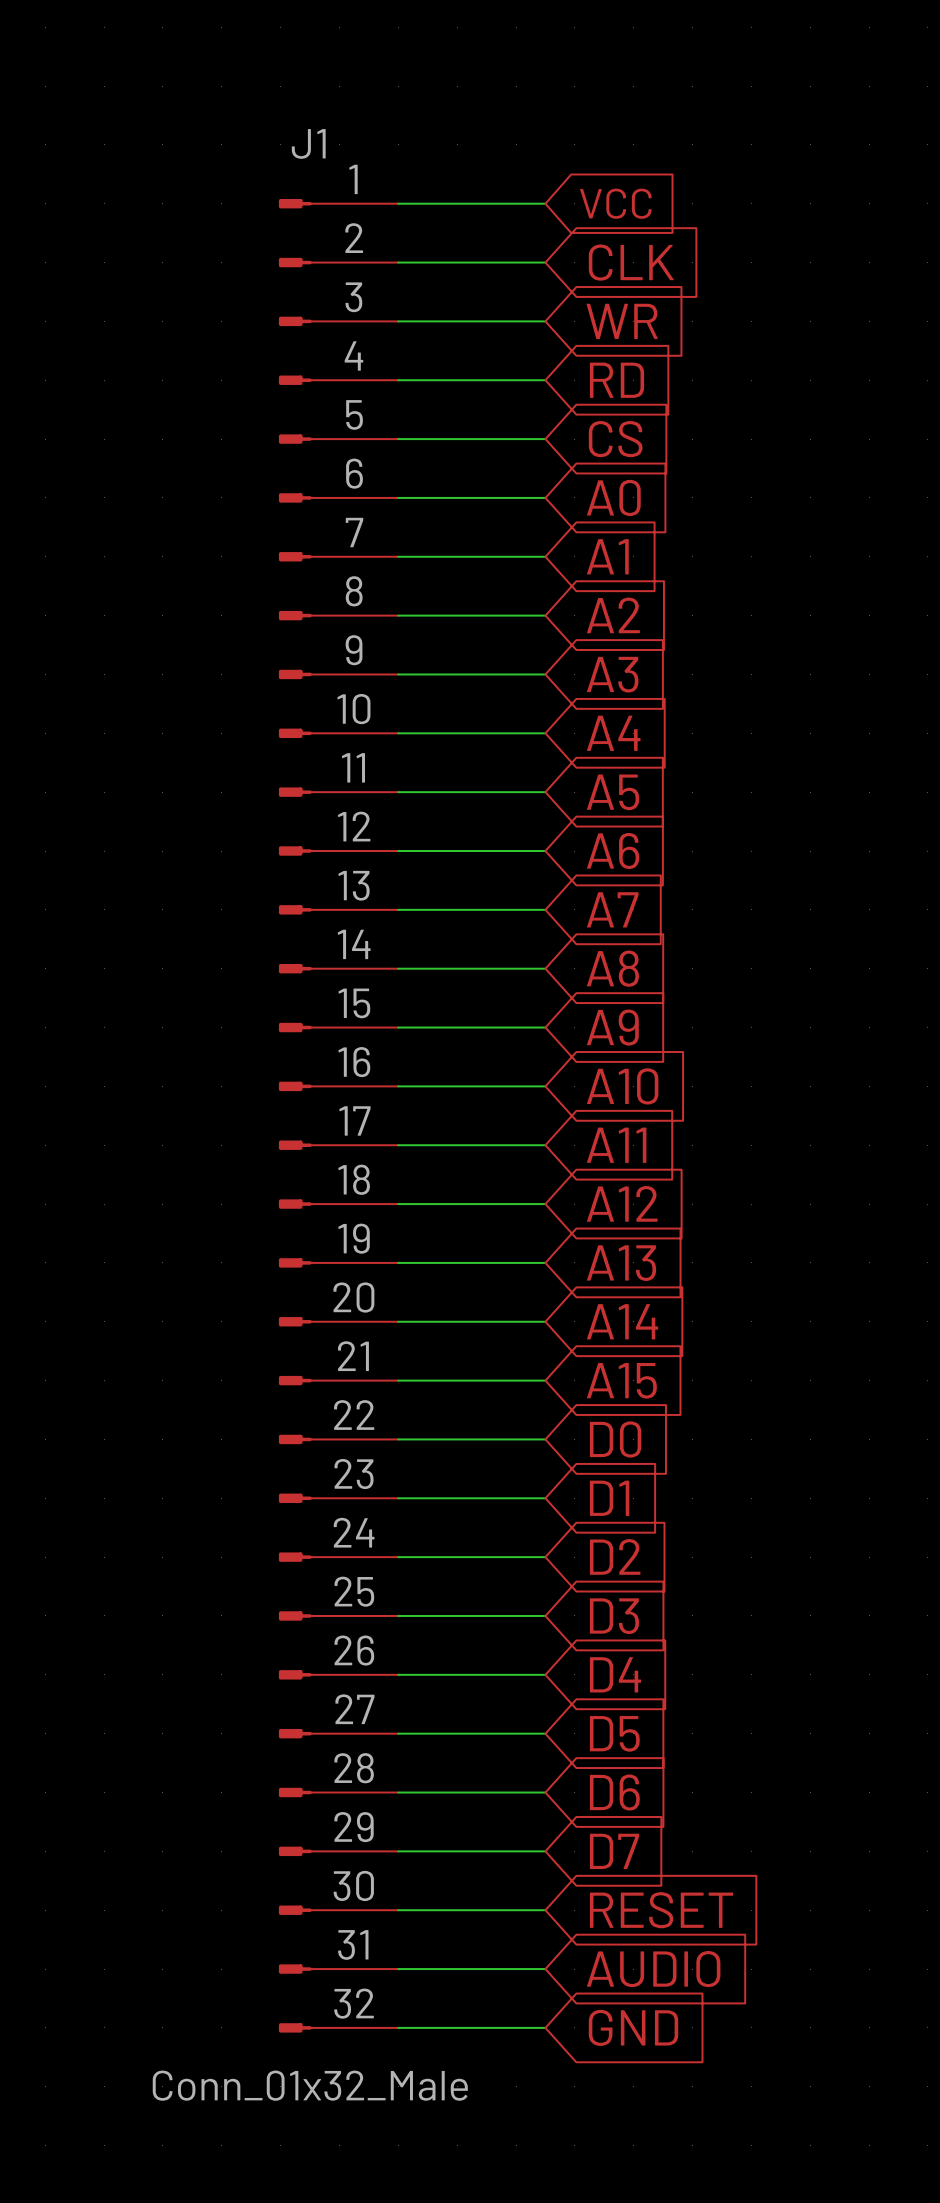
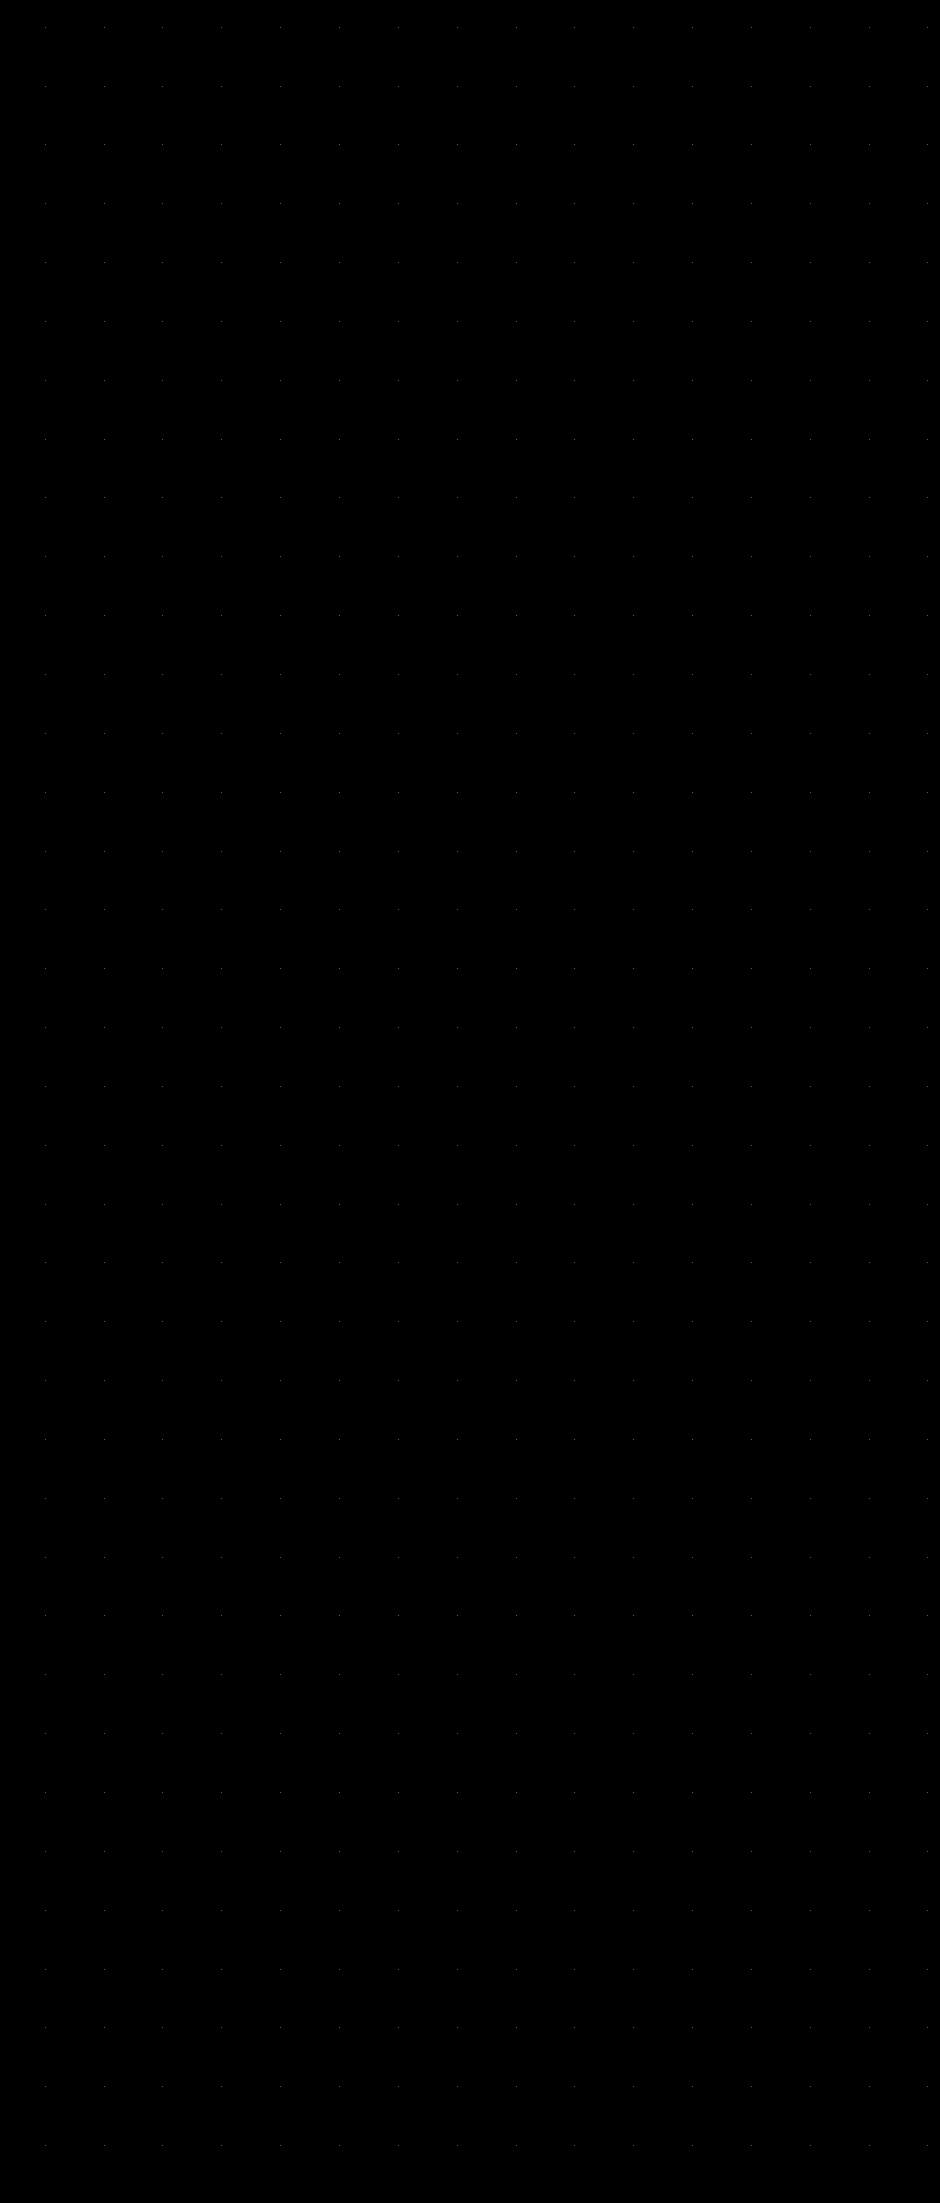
wire: (398, 203) (545, 203) -> none
global label: VCC (615, 203) -> none
wire: (398, 262) (545, 262) -> none
global label: CLK (631, 262) -> none
wire: (398, 321) (545, 321) -> none
global label: WR (622, 321) -> none
wire: (398, 380) (545, 380) -> none
global label: RD (616, 380) -> none
wire: (398, 439) (545, 439) -> none
global label: CS (615, 439) -> none
wire: (398, 497) (545, 497) -> none
global label: A0 (613, 497) -> none
wire: (398, 556) (545, 556) -> none
global label: A1 (607, 556) -> none
wire: (398, 615) (545, 615) -> none
global label: A2 (613, 615) -> none
wire: (398, 674) (545, 674) -> none
global label: A3 (612, 674) -> none
wire: (398, 733) (545, 733) -> none
global label: A4 (613, 733) -> none
wire: (398, 792) (545, 792) -> none
global label: A5 (613, 792) -> none
global label: A6 (613, 850) -> none
wire: (398, 851) (545, 851) -> none
wire: (398, 909) (545, 909) -> none
global label: A7 (612, 909) -> none
wire: (398, 968) (545, 968) -> none
global label: A8 (612, 968) -> none
wire: (398, 1027) (545, 1027) -> none
global label: A9 (612, 1027) -> none
wire: (398, 1086) (545, 1086) -> none
global label: A10 (622, 1086) -> none
J1: Conn_01x32_Male (338, 1115) -> none
wire: (398, 1145) (545, 1145) -> none
global label: A11 (616, 1145) -> none
global label: A12 (622, 1203) -> none
wire: (398, 1204) (545, 1204) -> none
wire: (398, 1262) (545, 1262) -> none
global label: A13 (621, 1263) -> none
wire: (398, 1321) (545, 1321) -> none
global label: A14 (622, 1321) -> none
wire: (398, 1380) (545, 1380) -> none
global label: A15 (621, 1380) -> none
wire: (398, 1439) (545, 1439) -> none
global label: D0 (615, 1439) -> none
wire: (398, 1498) (545, 1498) -> none
global label: D1 (609, 1498) -> none
global label: D2 (615, 1556) -> none
wire: (398, 1557) (545, 1557) -> none
wire: (398, 1615) (545, 1615) -> none
global label: D3 (614, 1616) -> none
wire: (398, 1674) (545, 1674) -> none
global label: D4 (615, 1674) -> none
wire: (398, 1733) (545, 1733) -> none
global label: D5 (614, 1733) -> none
wire: (398, 1792) (545, 1792) -> none
global label: D6 (614, 1792) -> none
wire: (398, 1851) (545, 1851) -> none
global label: D7 (614, 1851) -> none
wire: (398, 1910) (545, 1910) -> none
global label: RESET (661, 1910) -> none
wire: (398, 1969) (545, 1969) -> none
global label: AUDIO (653, 1969) -> none
wire: (398, 2027) (545, 2027) -> none
global label: GND (633, 2027) -> none

